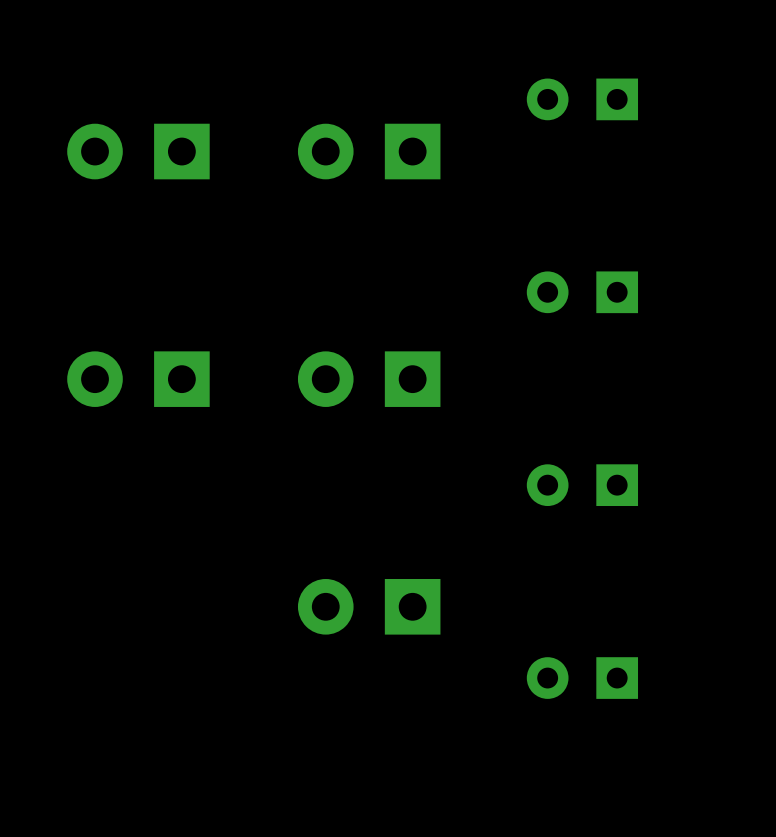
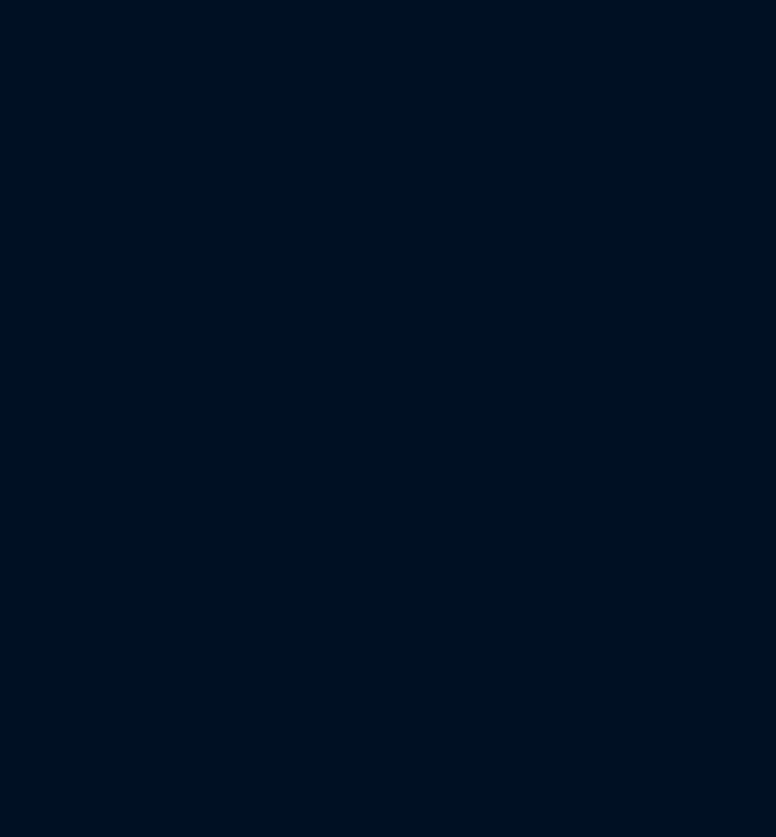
part: (582, 99) -> none
part: (138, 151) -> none
part: (369, 151) -> none
part: (582, 292) -> none
part: (138, 379) -> none
part: (369, 379) -> none
part: (582, 485) -> none
part: (369, 606) -> none
part: (582, 678) -> none

